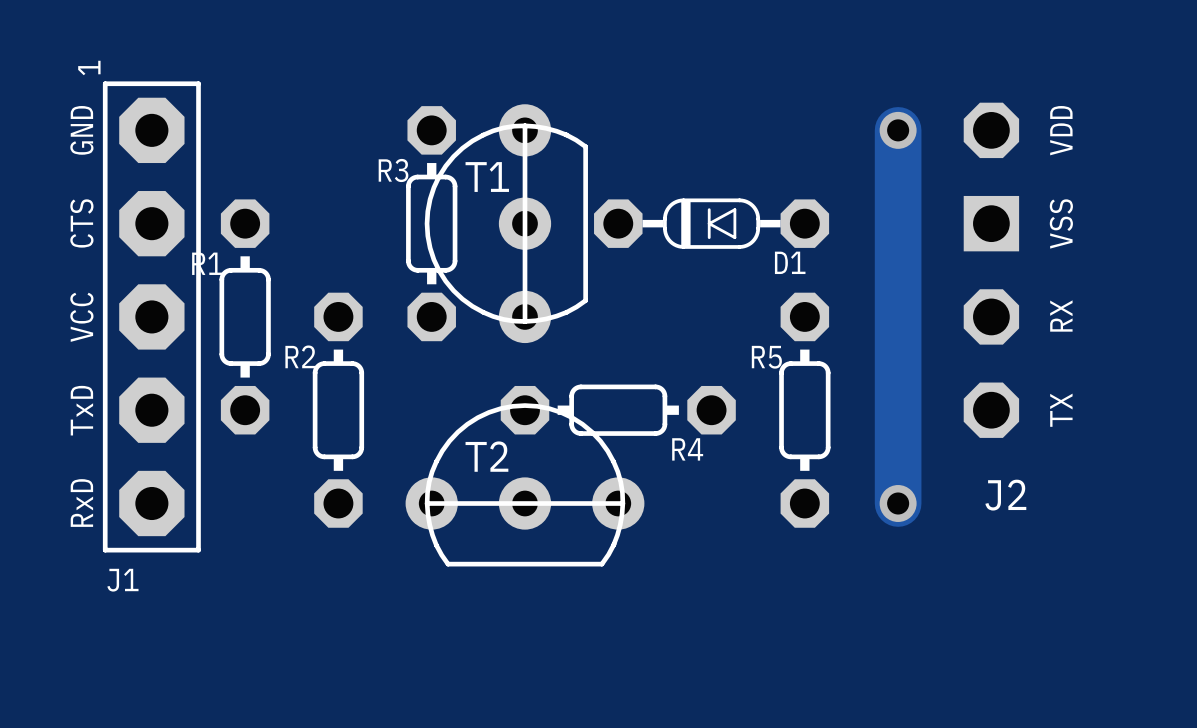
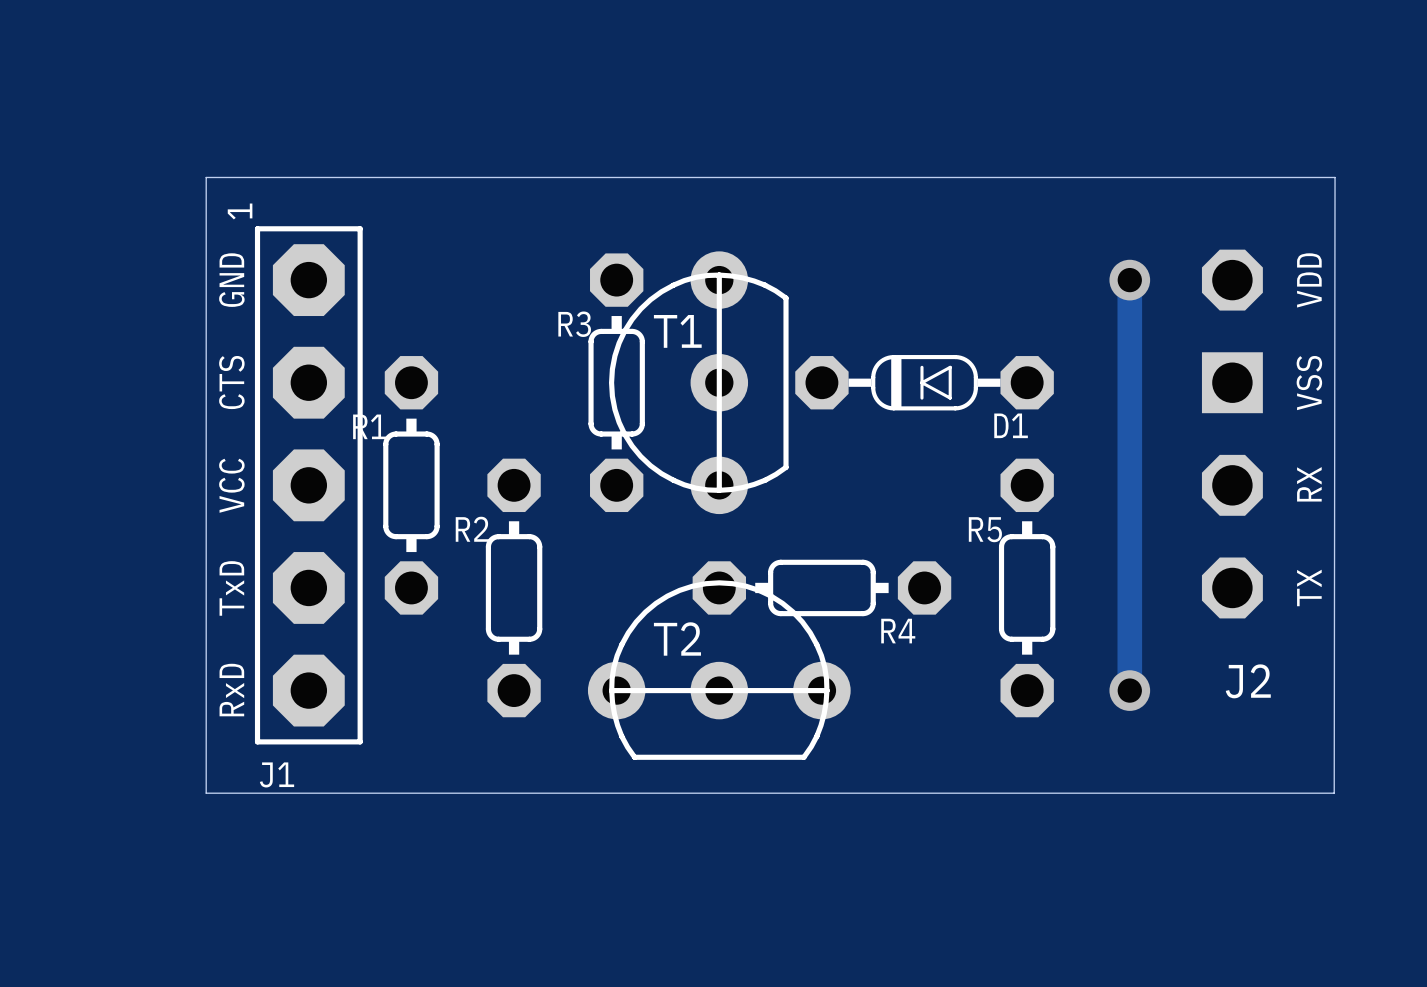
board edge: none -> (206, 177) (1335, 177) (1334, 793) (206, 793) (206, 177)
track width: thick (898, 130) (898, 503) -> thin (1129, 280) (1129, 690)

